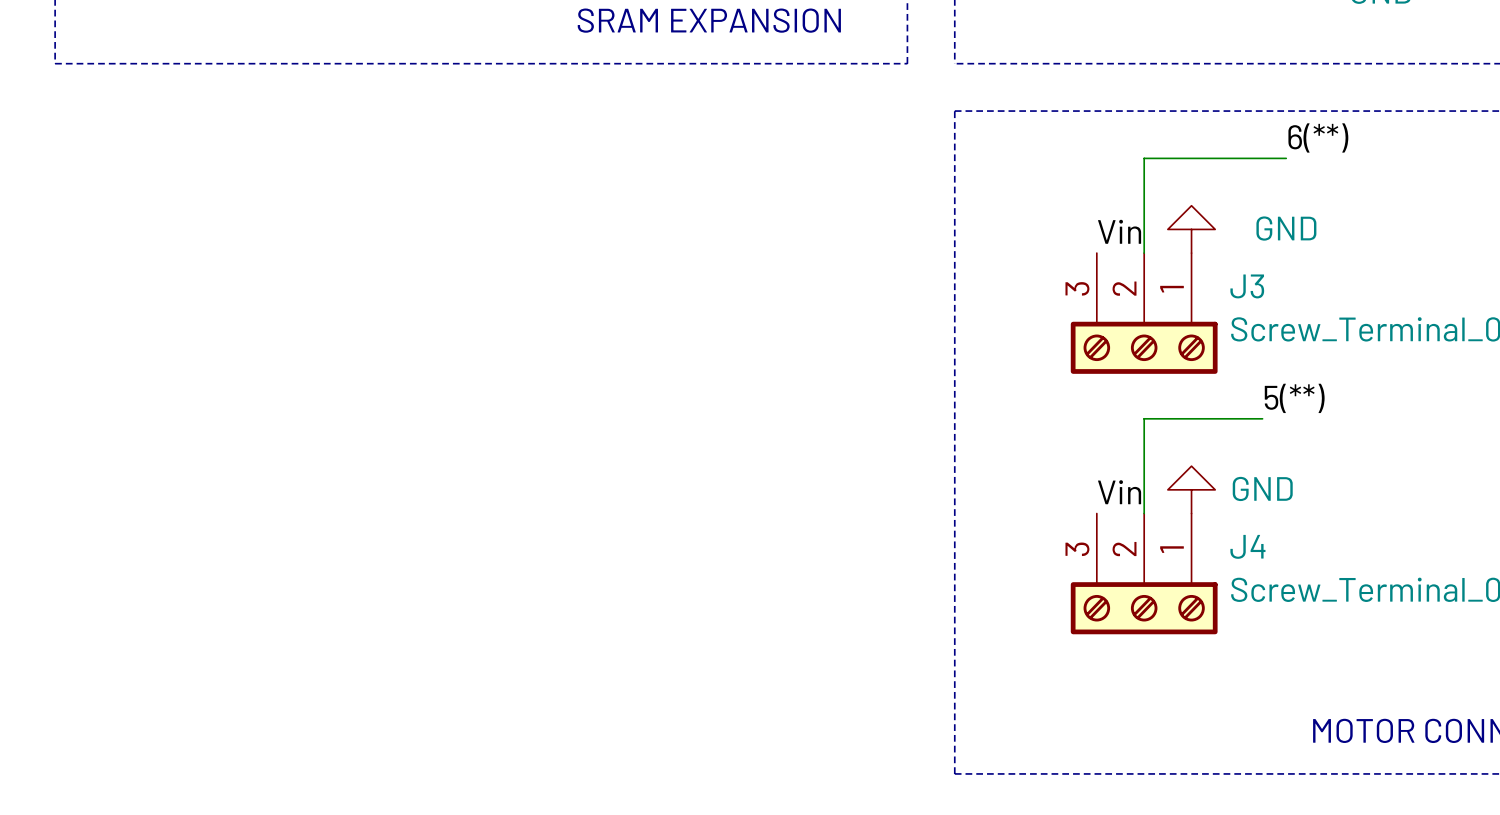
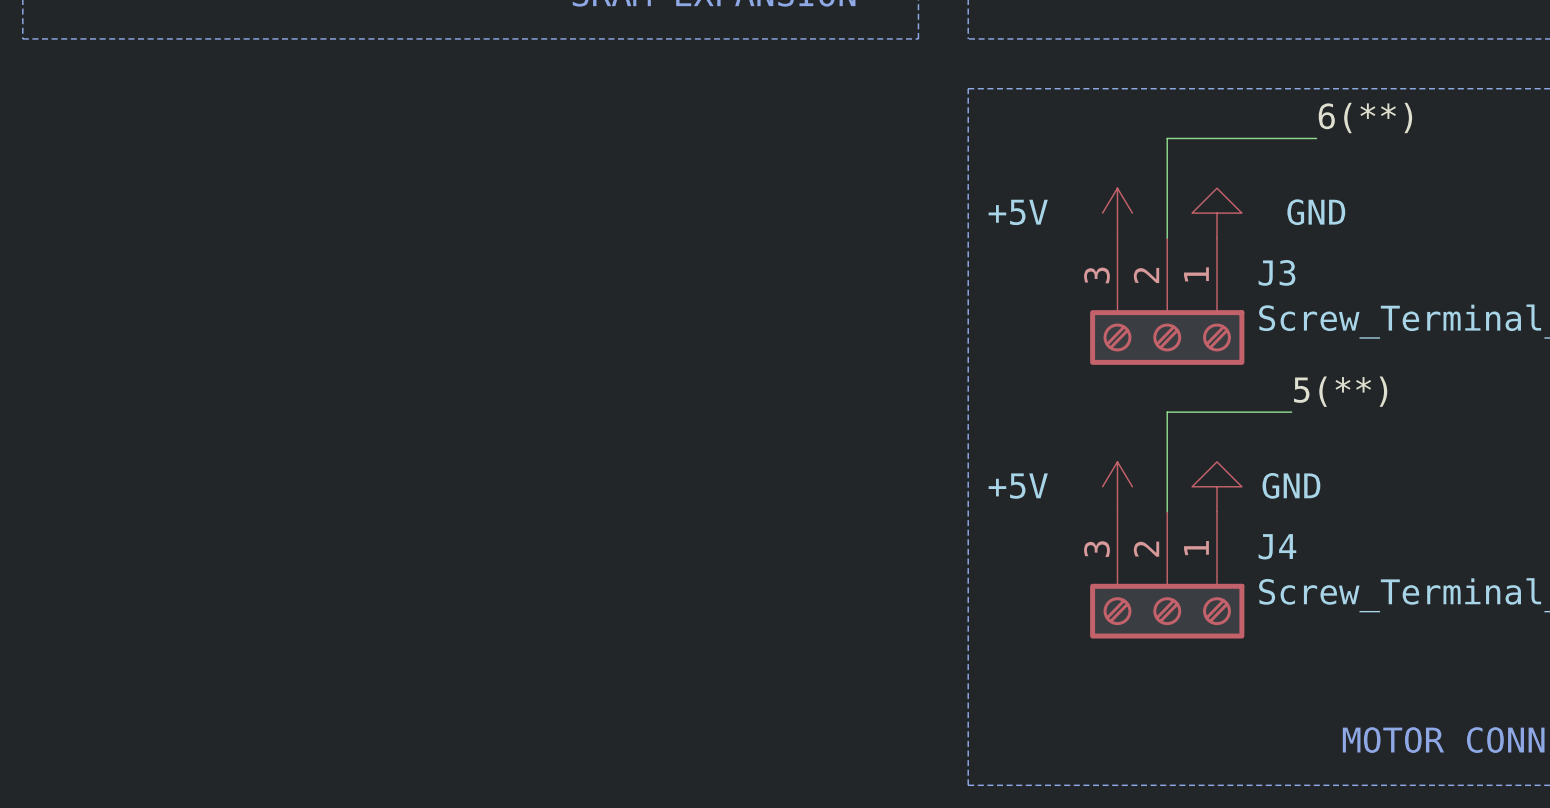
power symbol: none -> +5V (1117, 213)
label: Vin (1119, 231) -> none
power symbol: none -> +5V (1117, 486)
label: Vin (1119, 492) -> none

